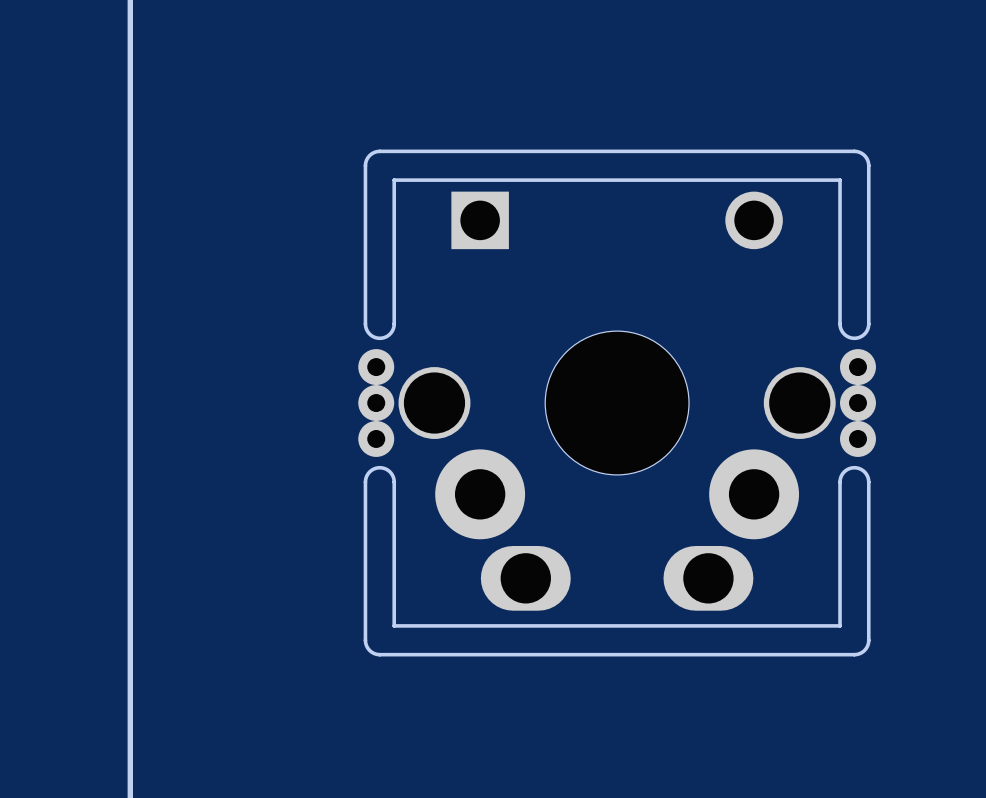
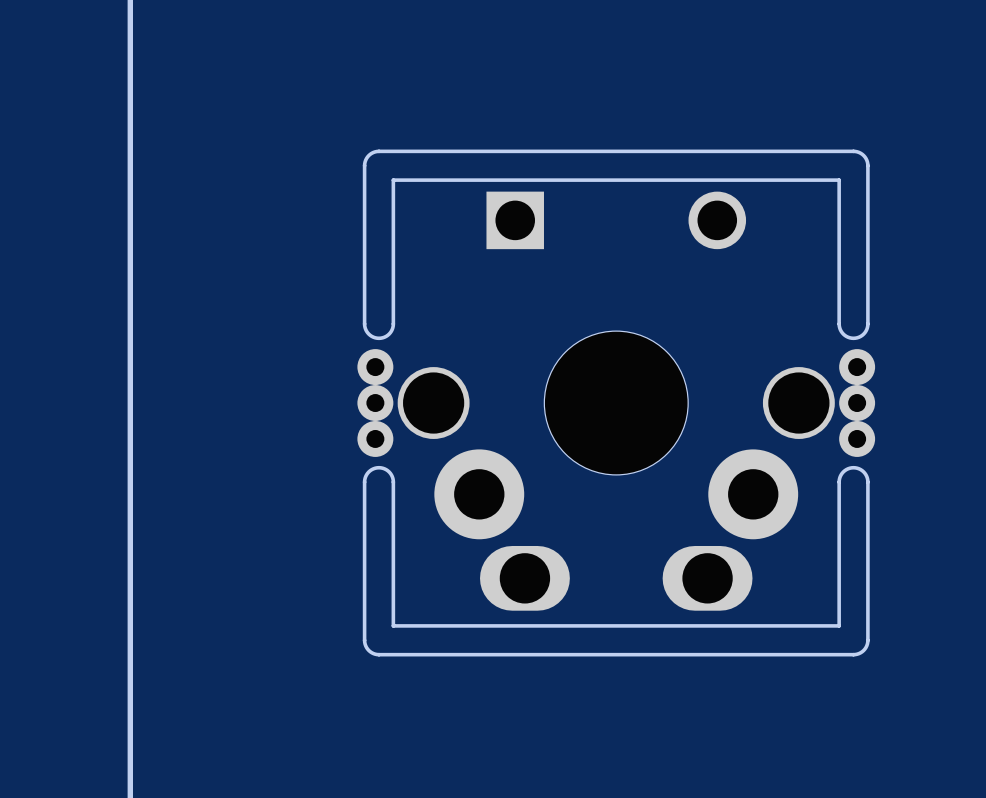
part footprint: [358, 149, 876, 657] -> [357, 149, 876, 657]

